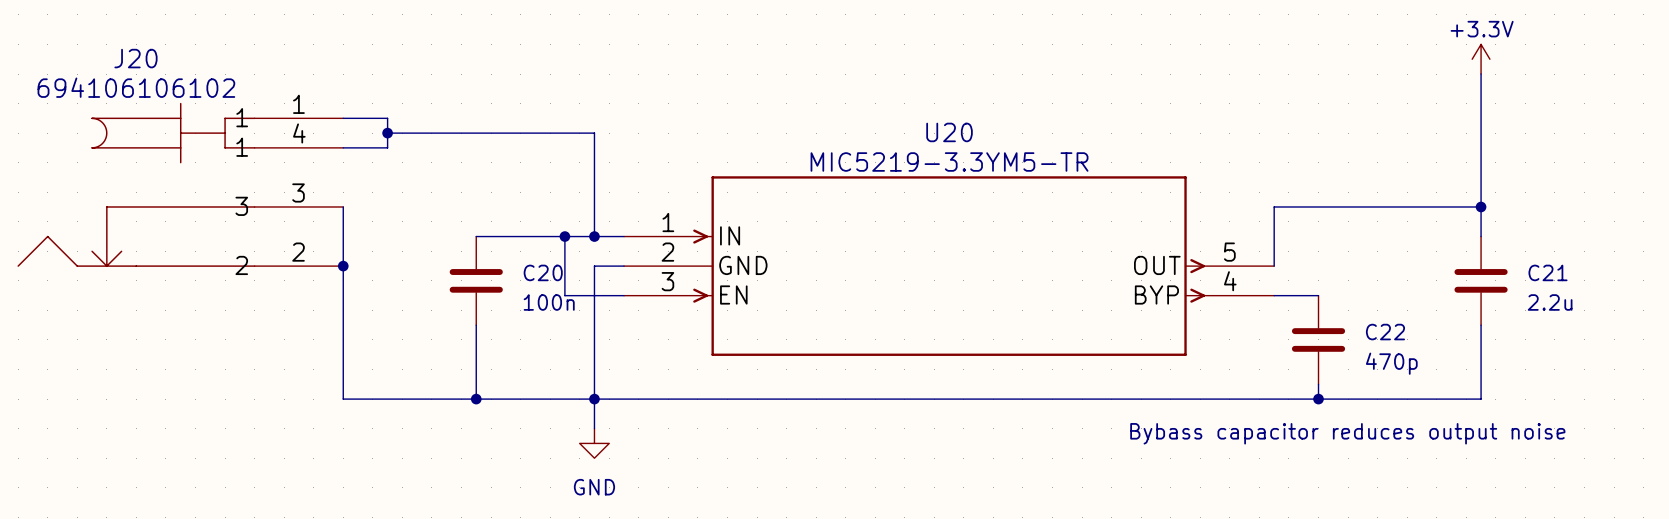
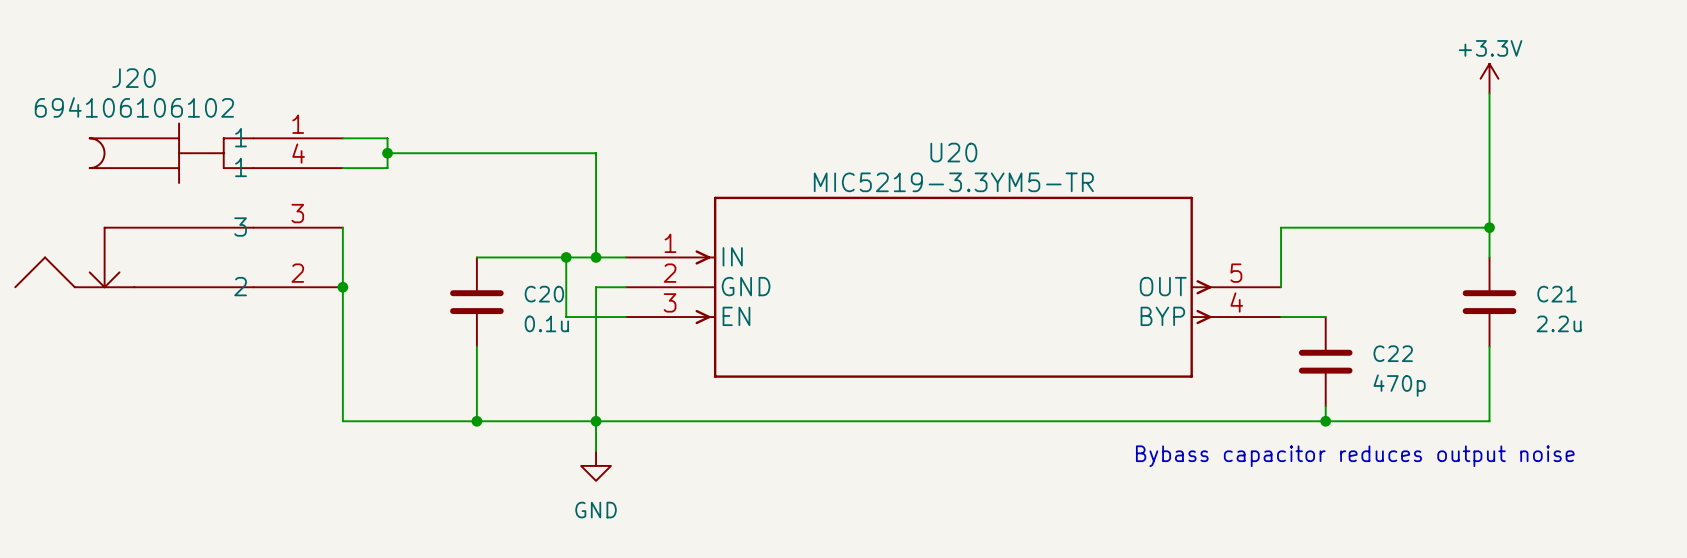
C20 value: 100n (549, 302) -> 0.1u (546, 323)

